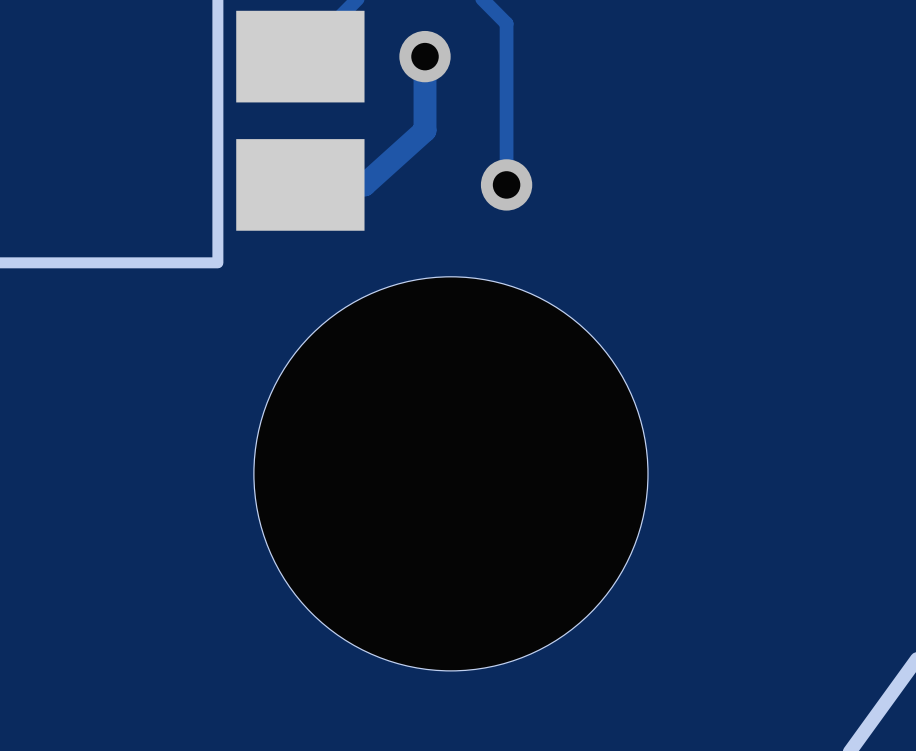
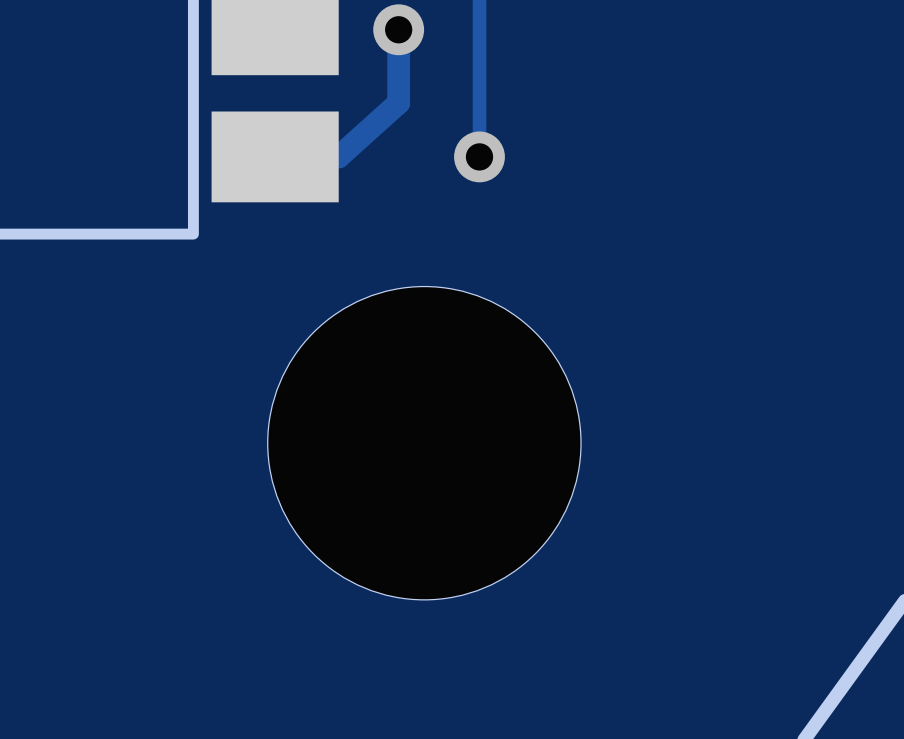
part footprint: [253, 276, 648, 671] -> [267, 286, 582, 600]

